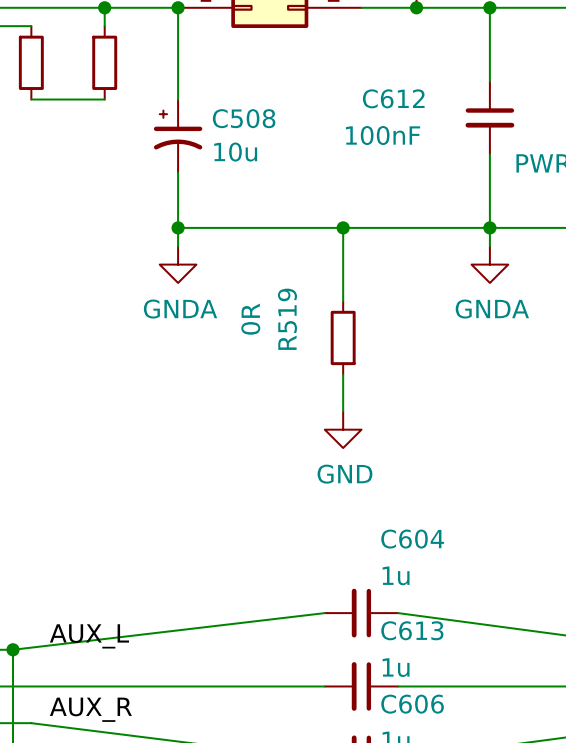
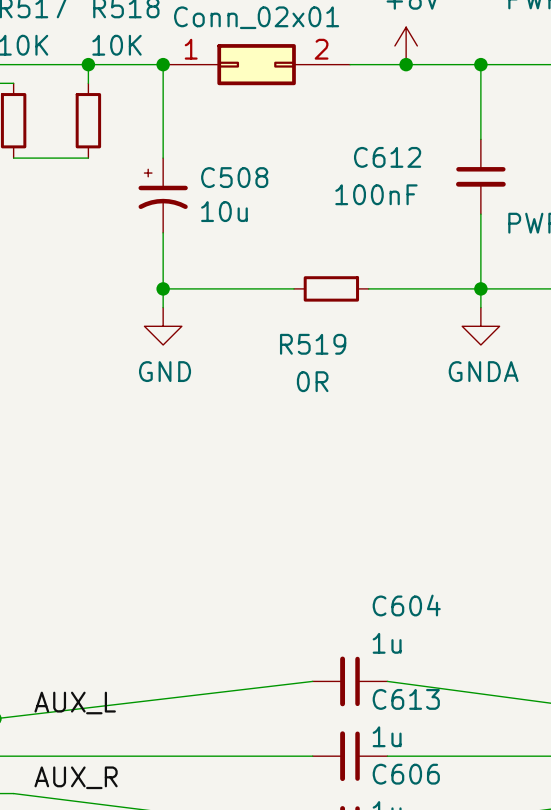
wire: (306, 227) (379, 227) -> none
wire: (343, 227) (343, 301) -> none
junction: (343, 227) -> none
power symbol: GNDA (178, 264) -> GND (163, 326)
R519 value position: 0R (250, 319) -> 0R (312, 381)
R519 name position: R519 (287, 319) -> R519 (313, 344)
R519 rotation: 0° (343, 337) -> 90° clockwise (331, 288)
R519 position: (343, 337) -> (331, 288)
wire: (343, 374) (343, 411) -> none
power symbol: GND (343, 429) -> none

